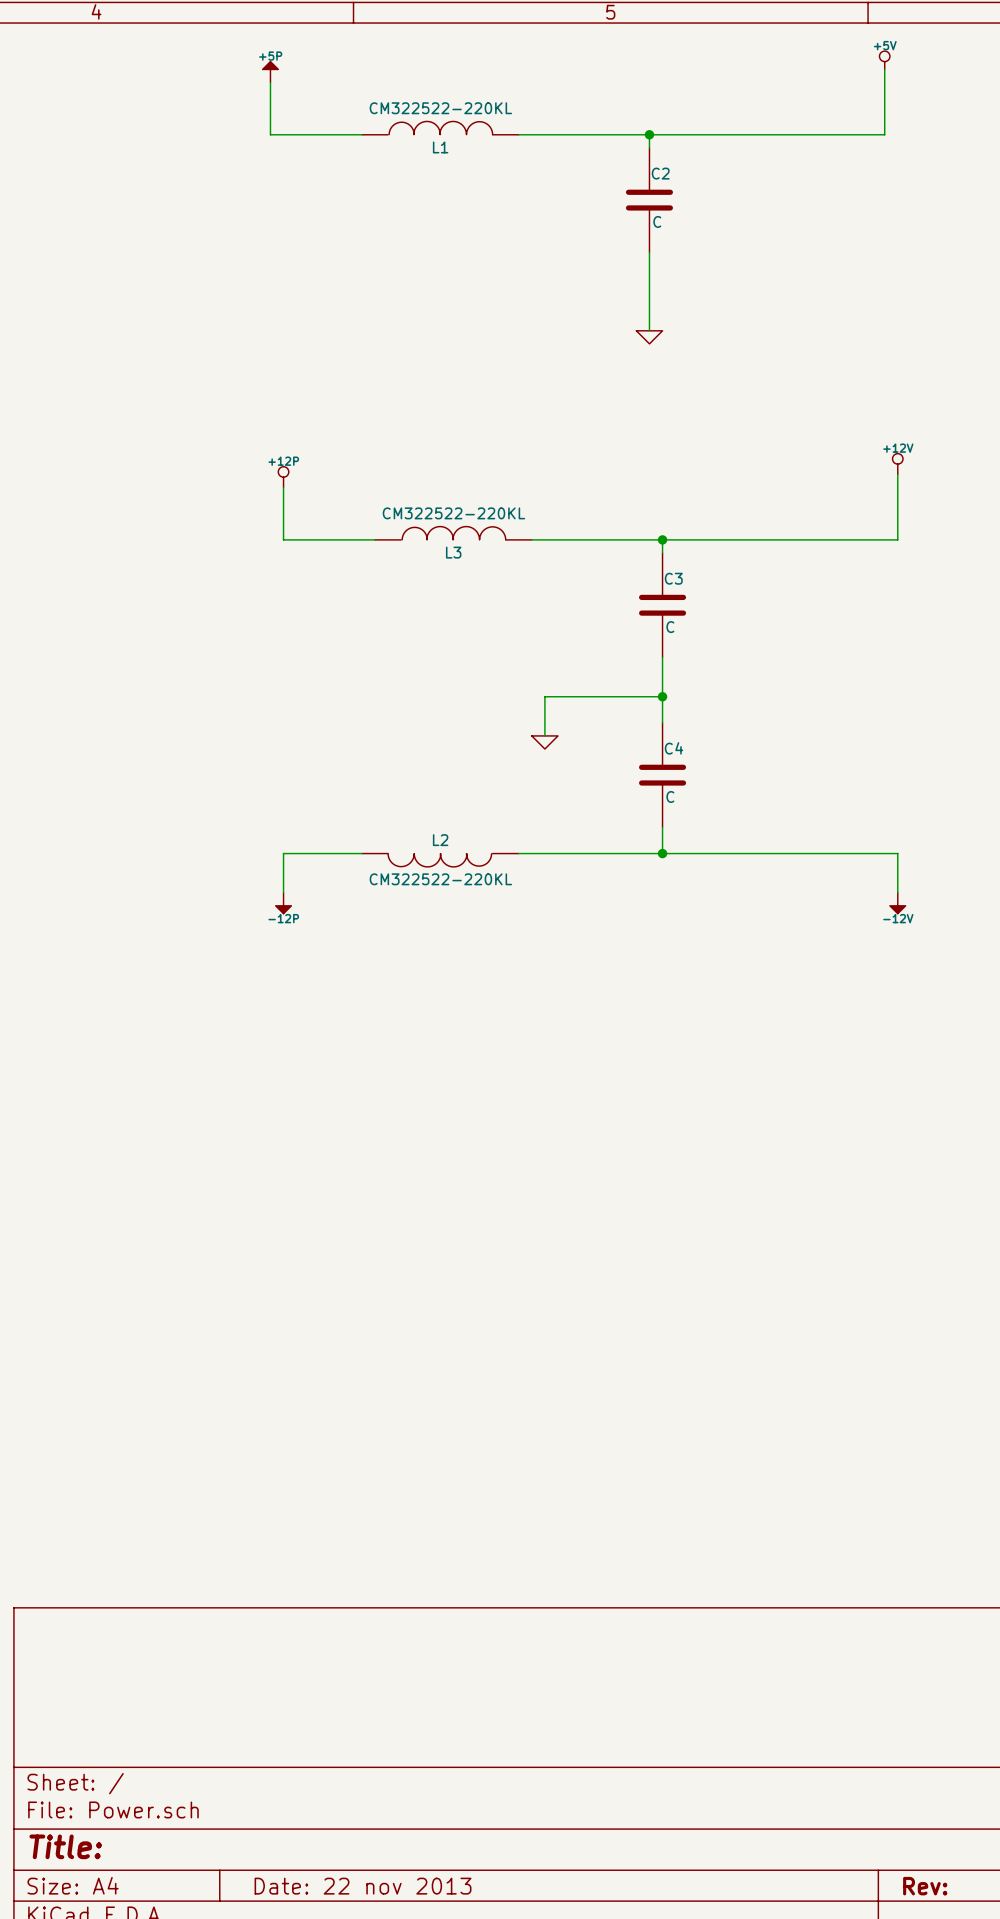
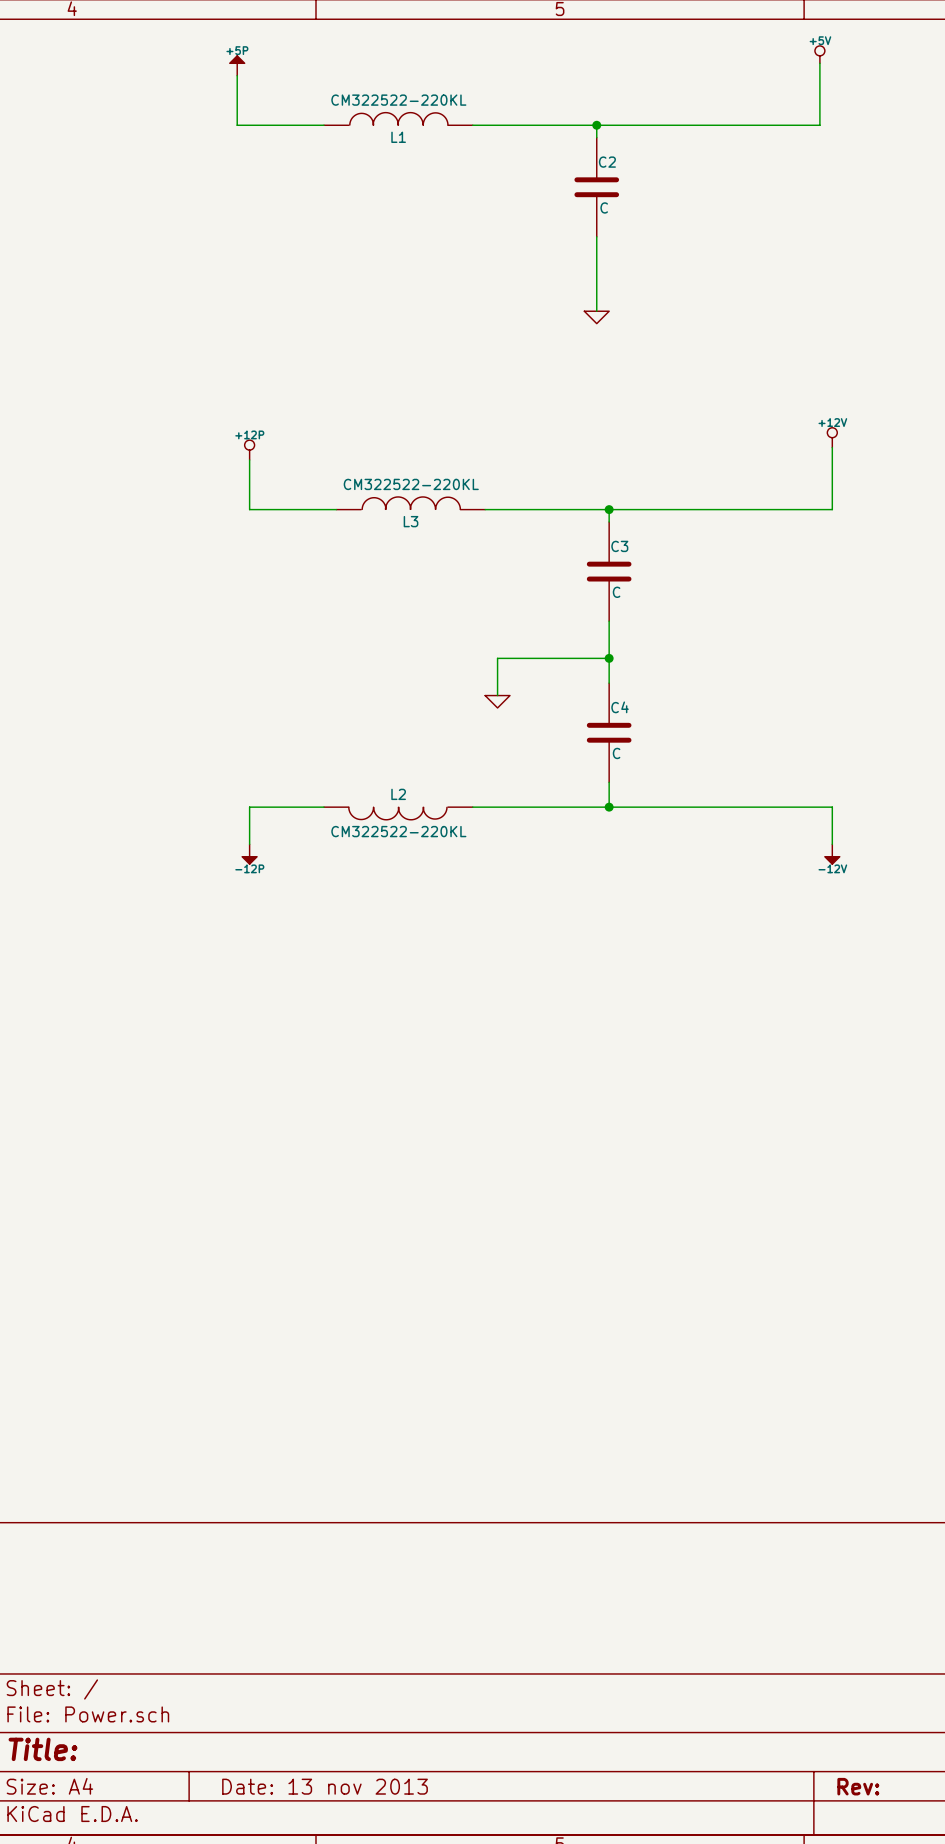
title block: Date: 22 nov 2013 (363, 1886) -> Date: 13 nov 2013 (325, 1786)

